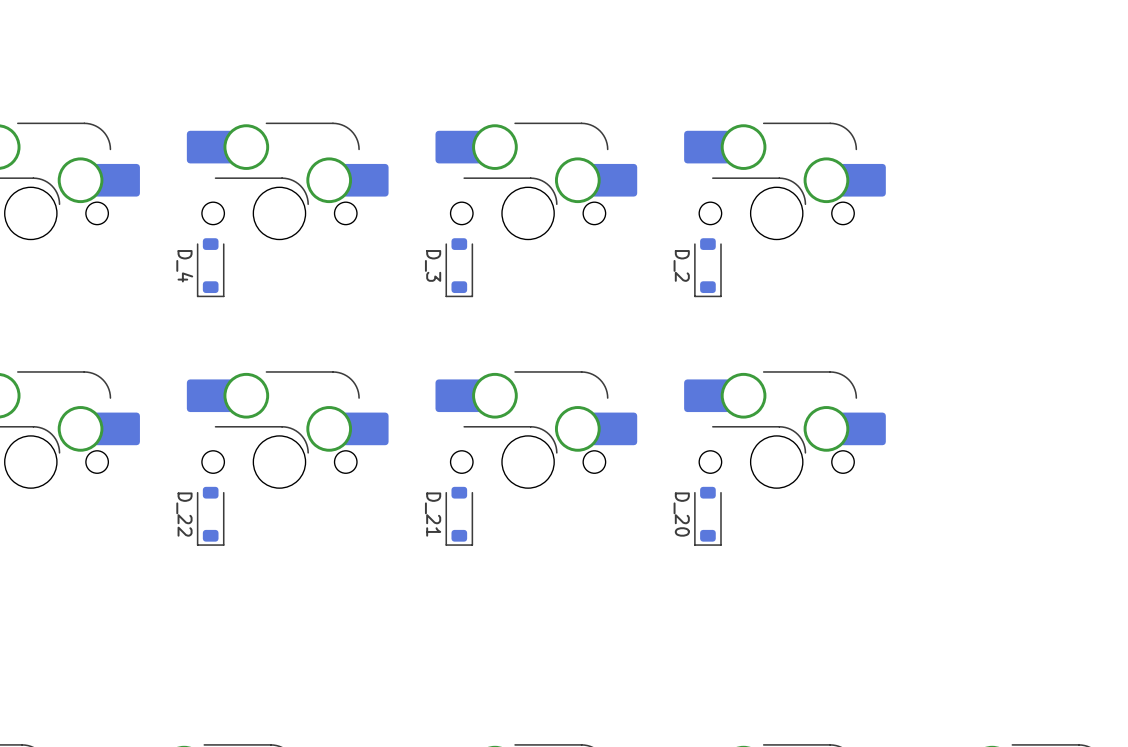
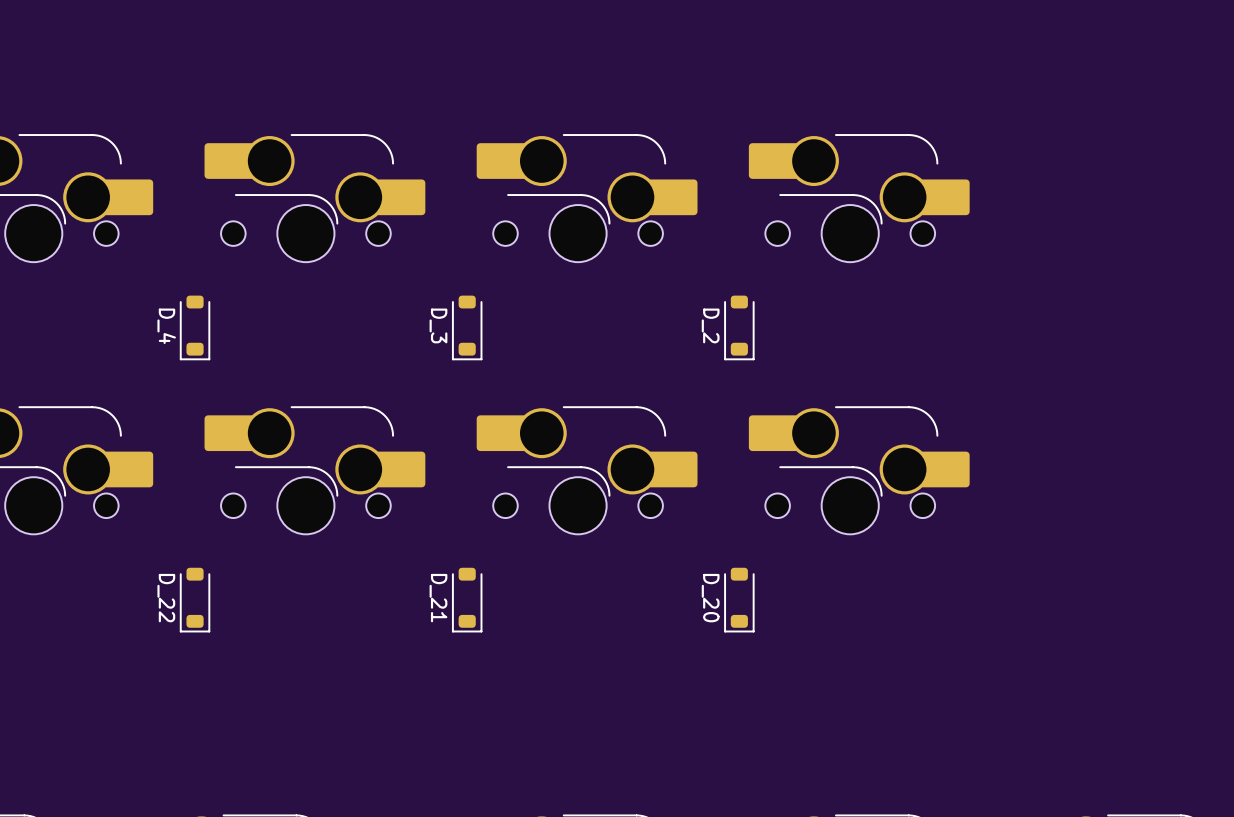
D_4 position: (210, 267) -> (195, 327)
D_3 position: (459, 267) -> (467, 327)
D_2 position: (707, 267) -> (739, 327)
D_22 position: (210, 516) -> (195, 600)
D_21 position: (459, 516) -> (467, 600)
D_20 position: (707, 516) -> (739, 600)

